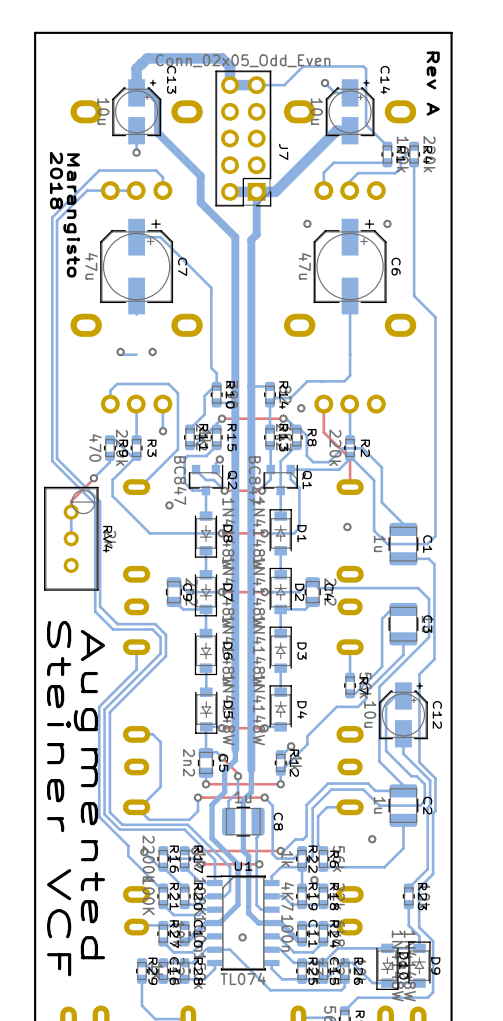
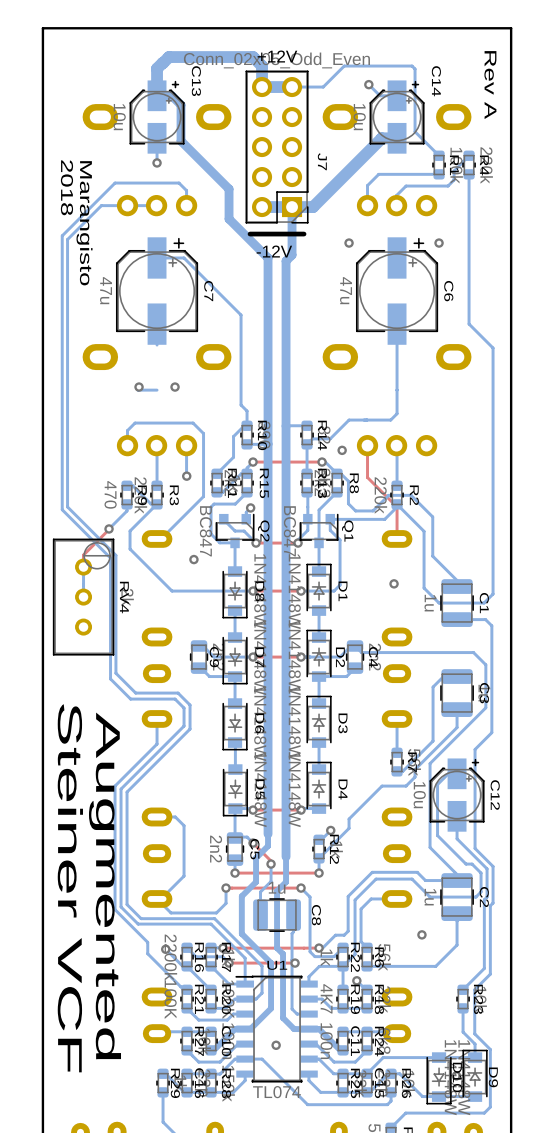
text: none -> +12V (277, 56)
line: none -> (304, 234) (250, 234)
text: none -> -12V (274, 251)

